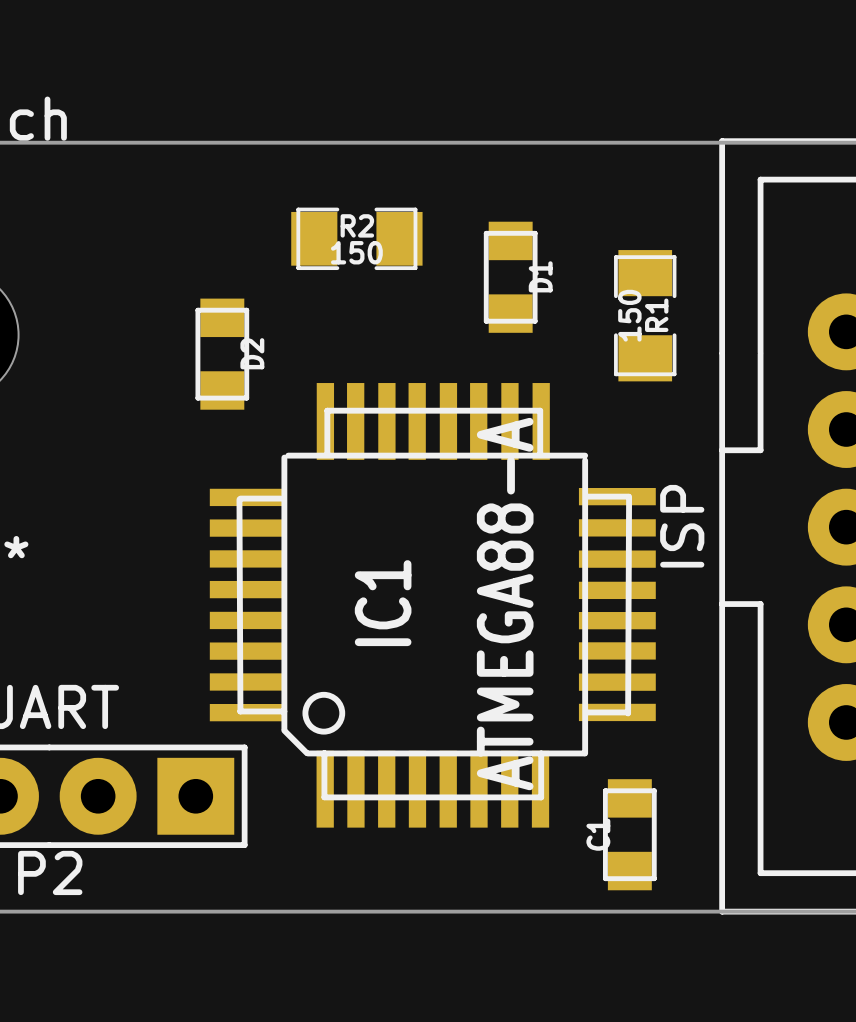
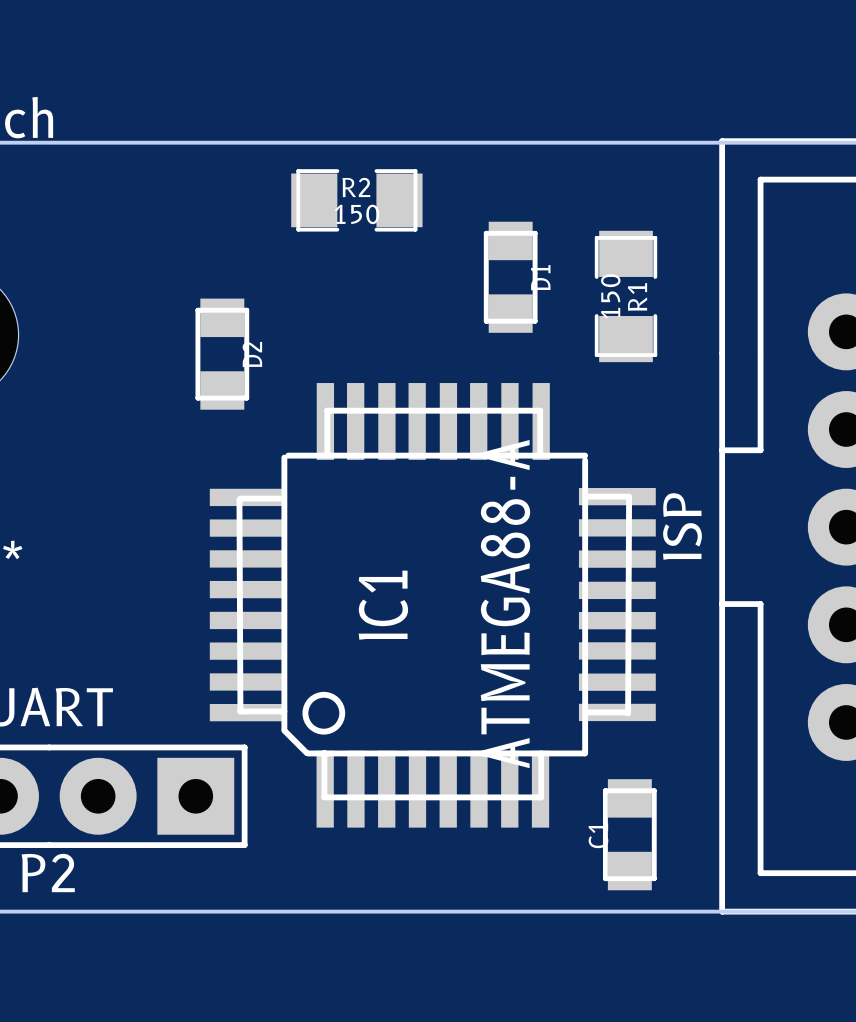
R2 position: (356, 238) -> (356, 200)
R1 position: (645, 315) -> (626, 296)

